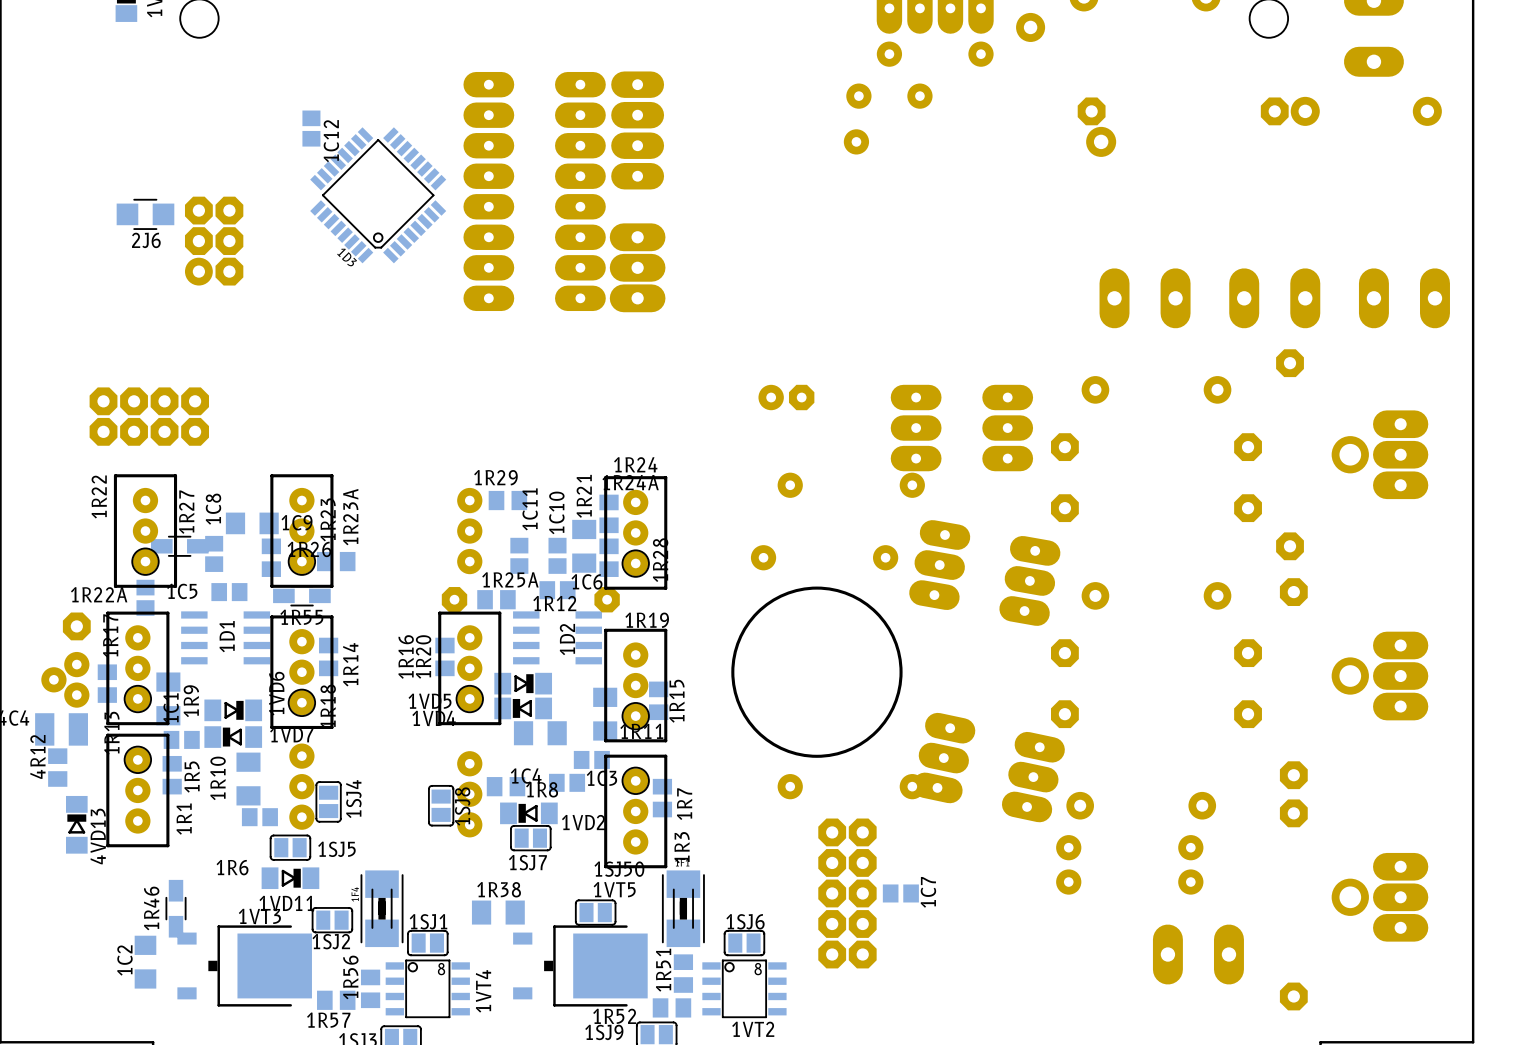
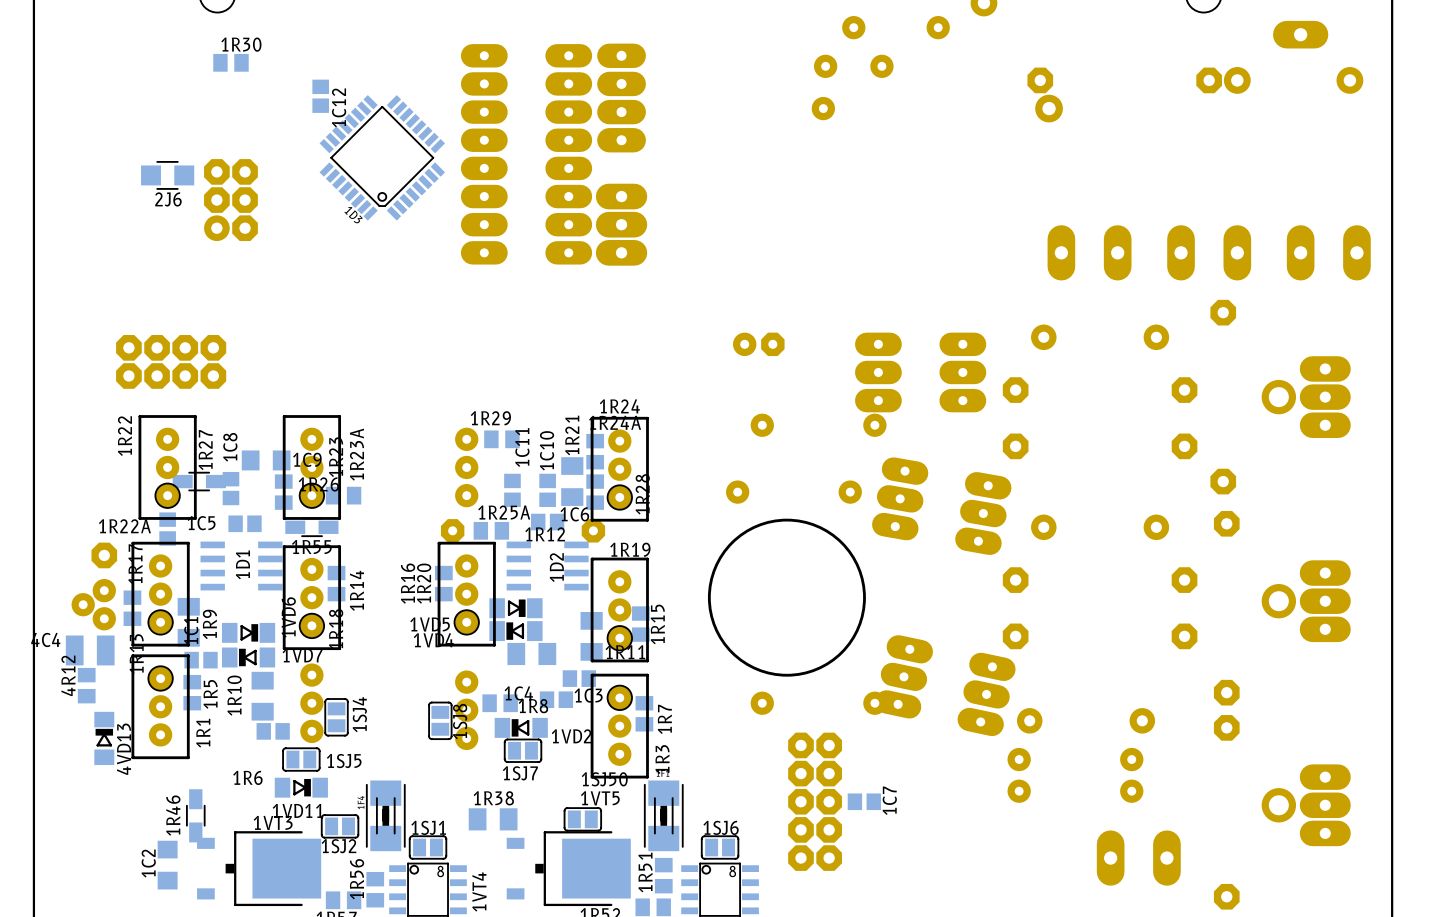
1R30: none -> (230, 62)

